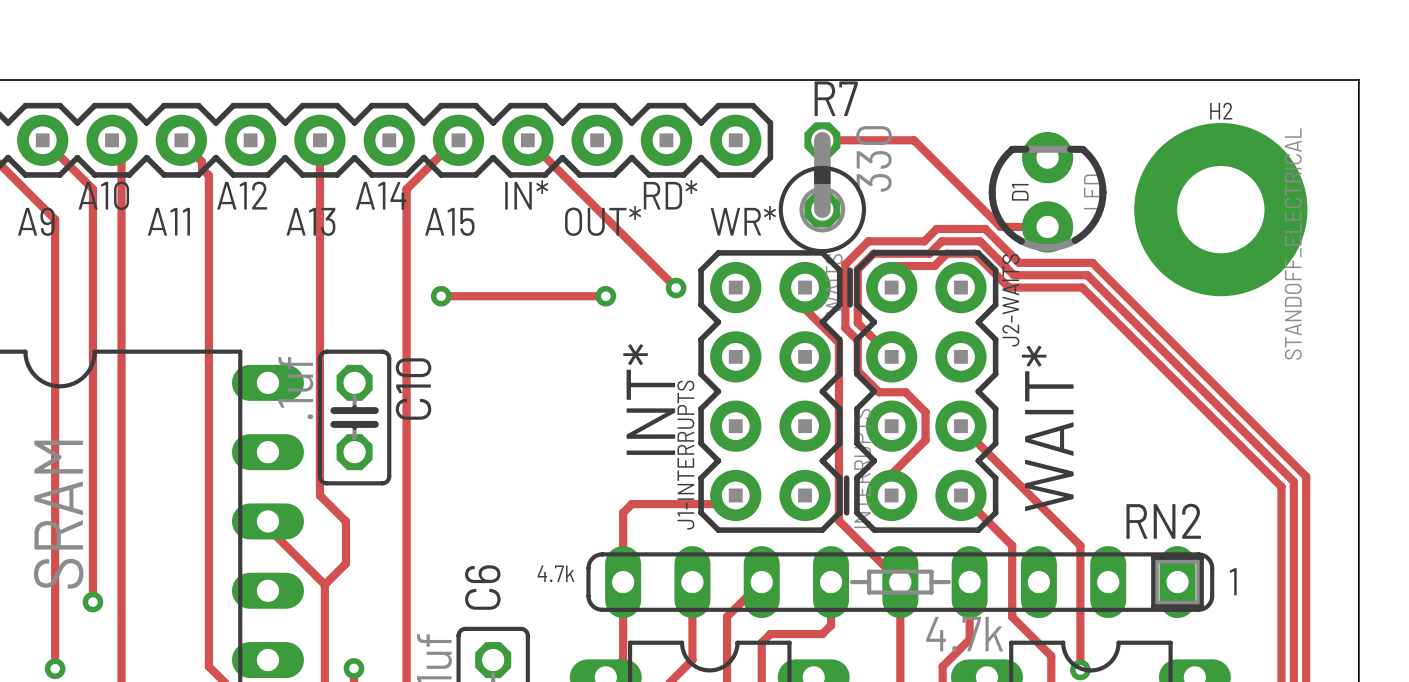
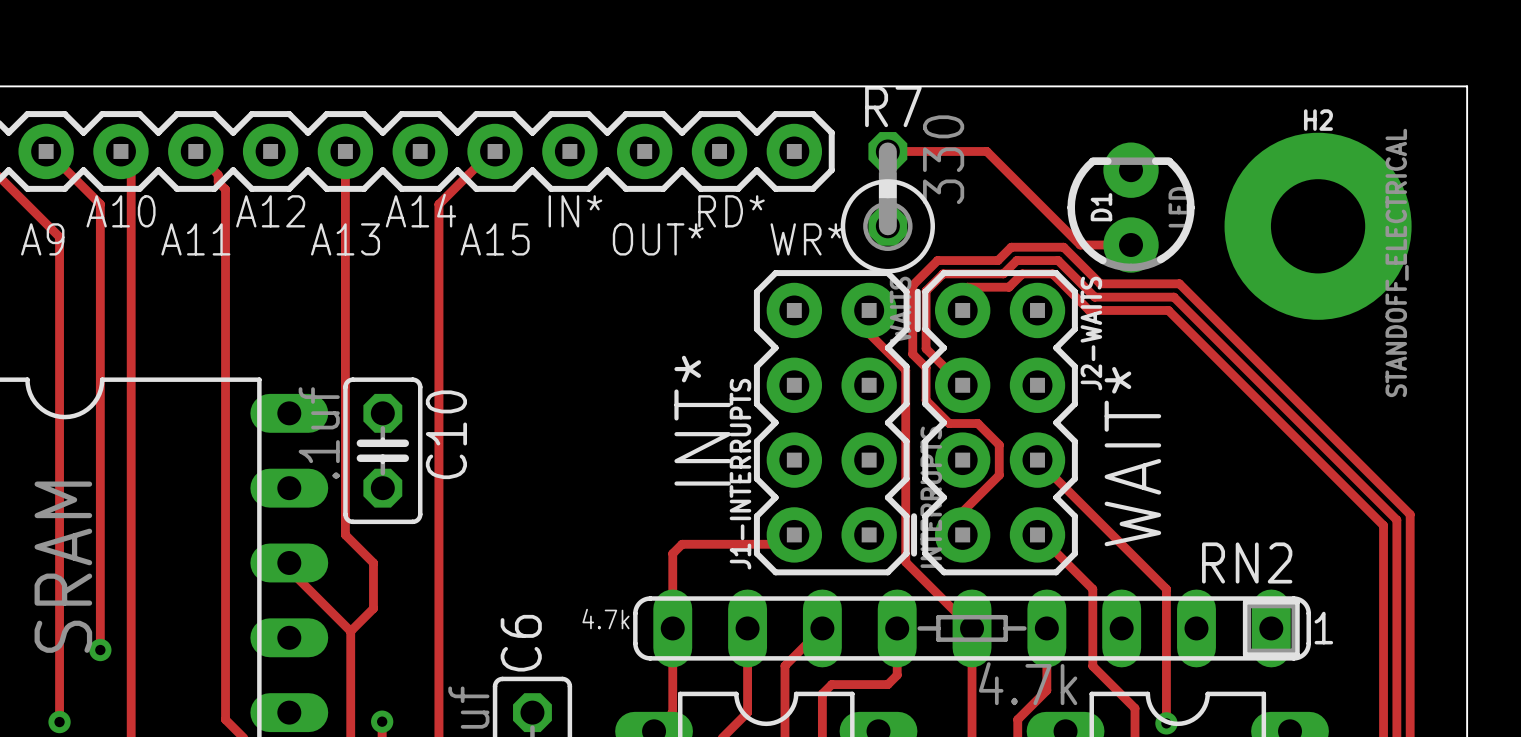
track: (527, 140) (676, 288) -> none
via: (676, 288) -> none
track: (441, 296) (605, 296) -> none
via: (441, 296) -> none
via: (605, 296) -> none

